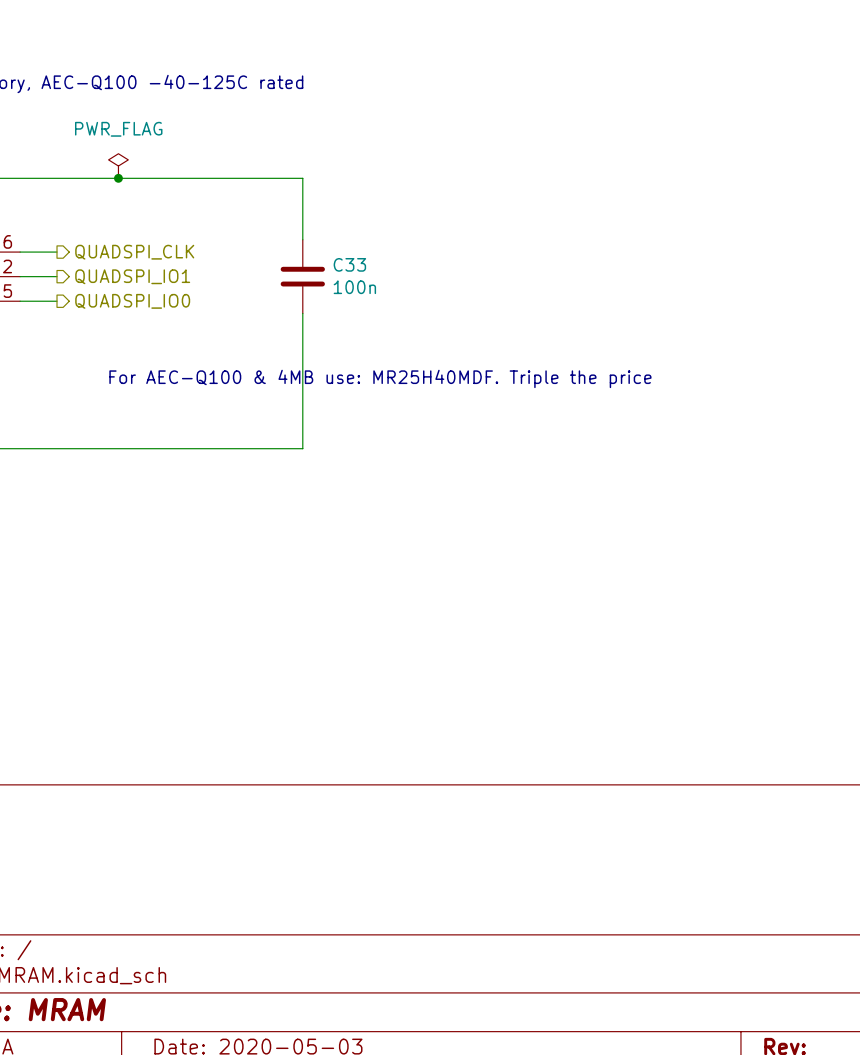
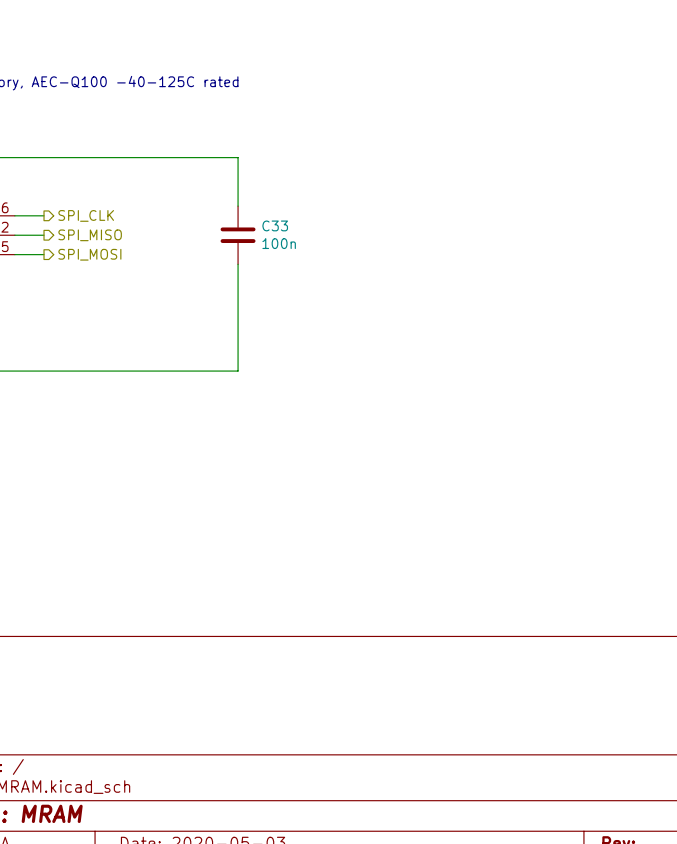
power symbol: PWR_FLAG (118, 166) -> none
junction: (118, 178) -> none
hierarchical label: QUADSPI_CLK (134, 252) -> SPI_CLK (86, 215)
hierarchical label: QUADSPI_IO1 (132, 276) -> SPI_MISO (90, 235)
hierarchical label: QUADSPI_IO0 (132, 301) -> SPI_MOSI (89, 254)
text: For AEC-Q100 & 4MB use: MR25H40MDF. Triple the price (380, 378) -> none

